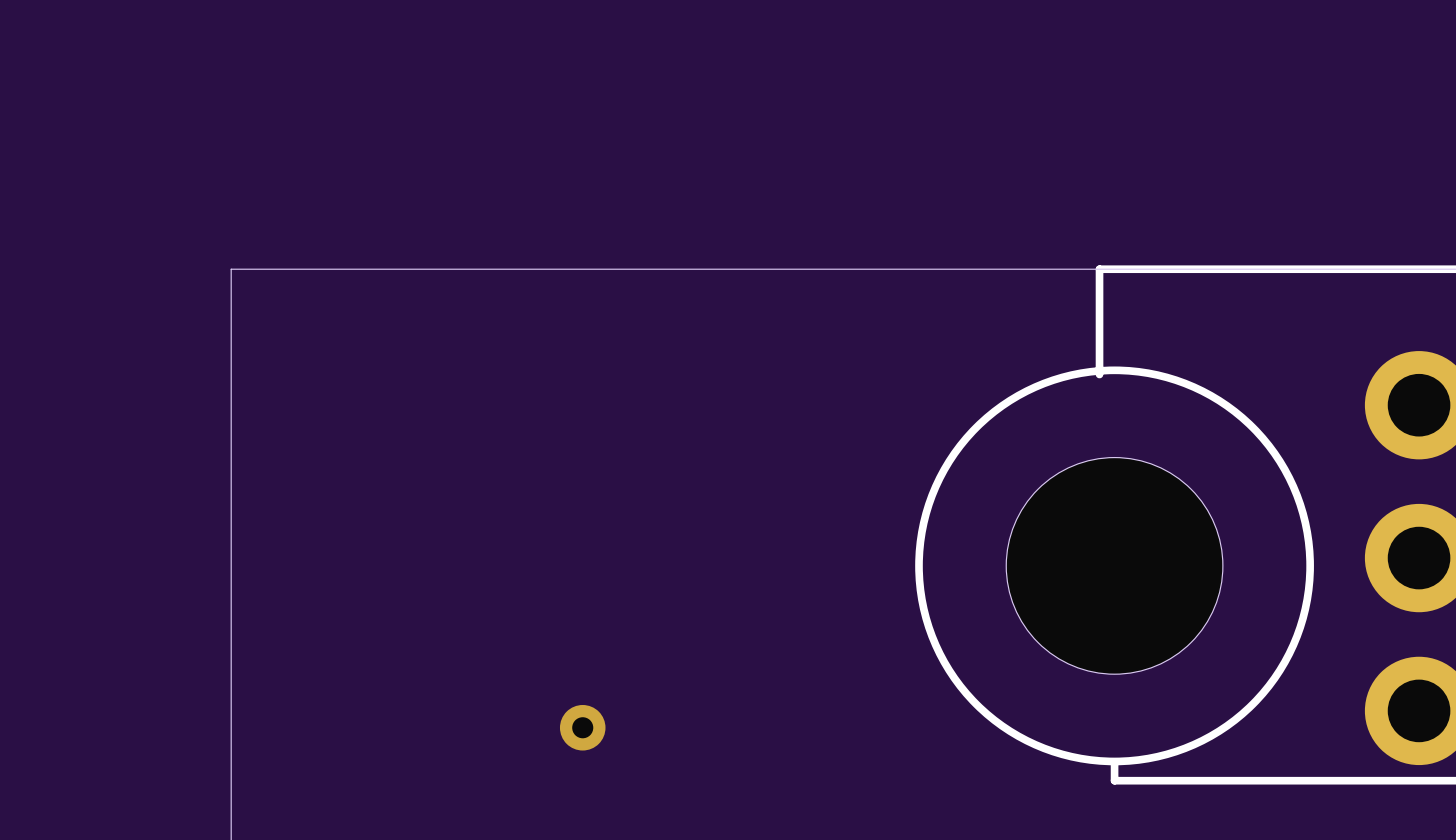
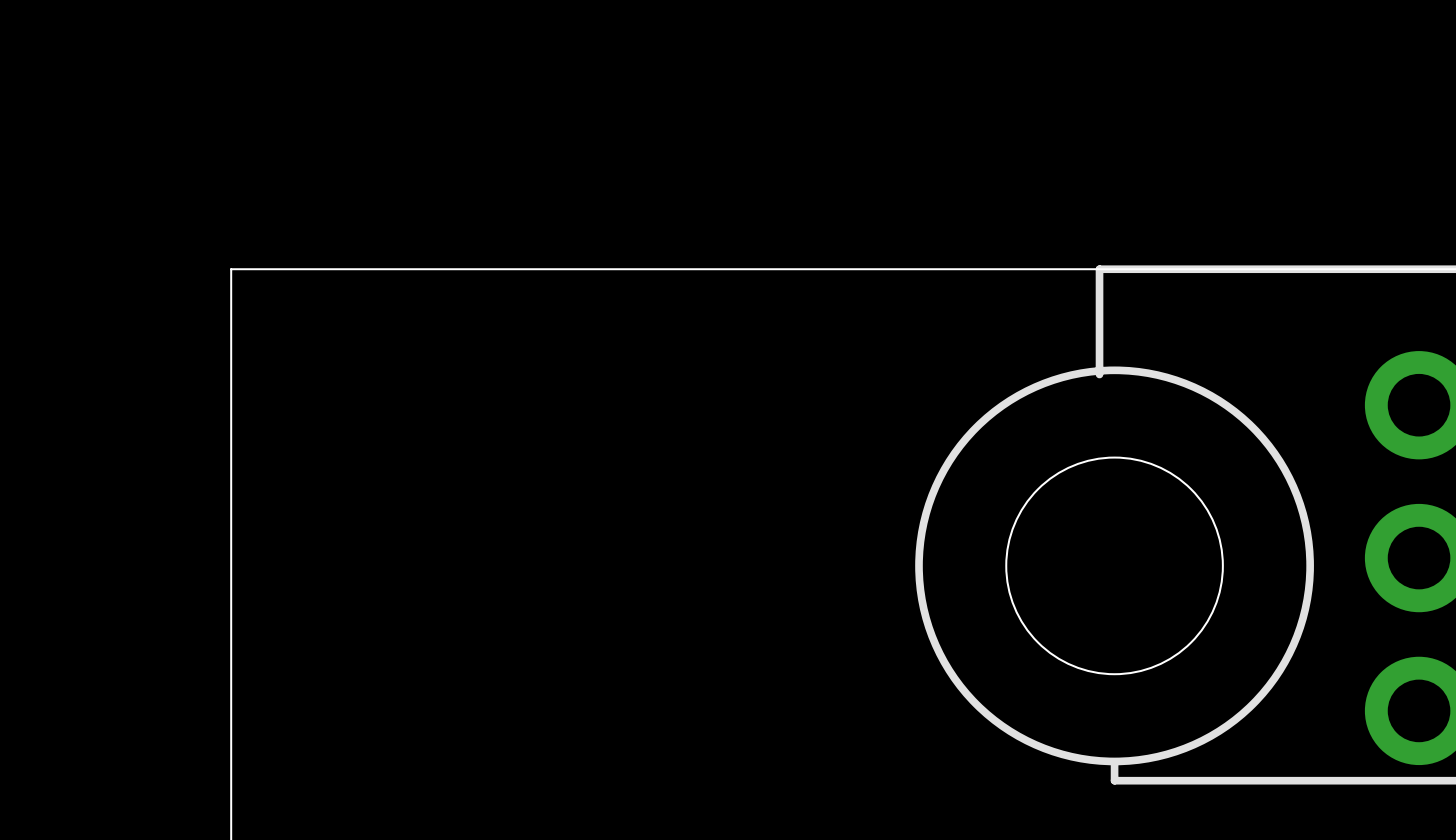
via: (582, 727) -> none

